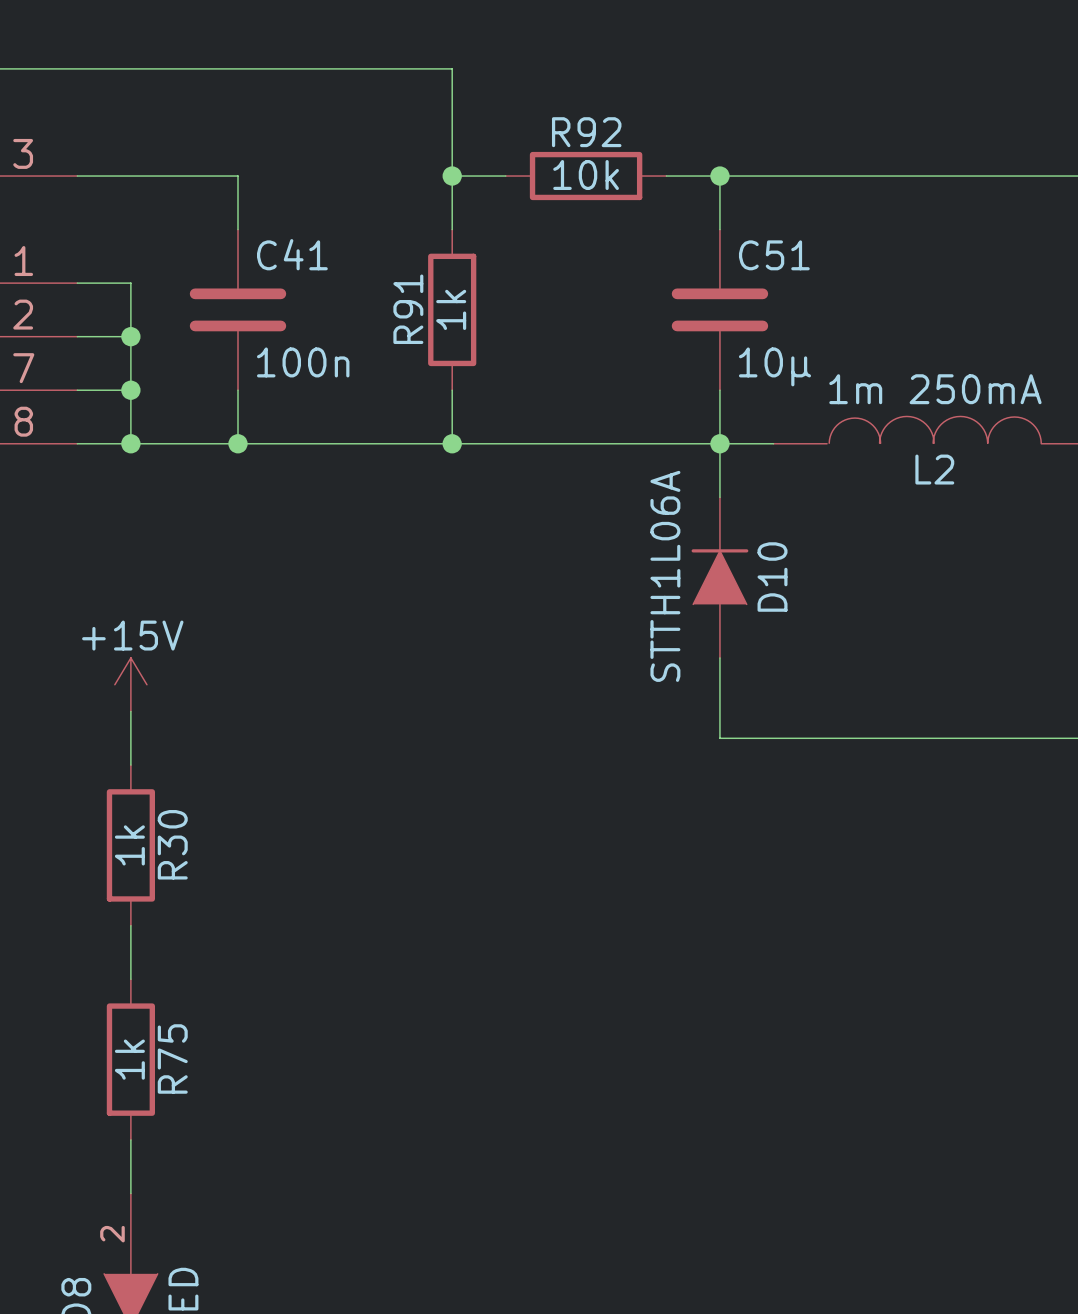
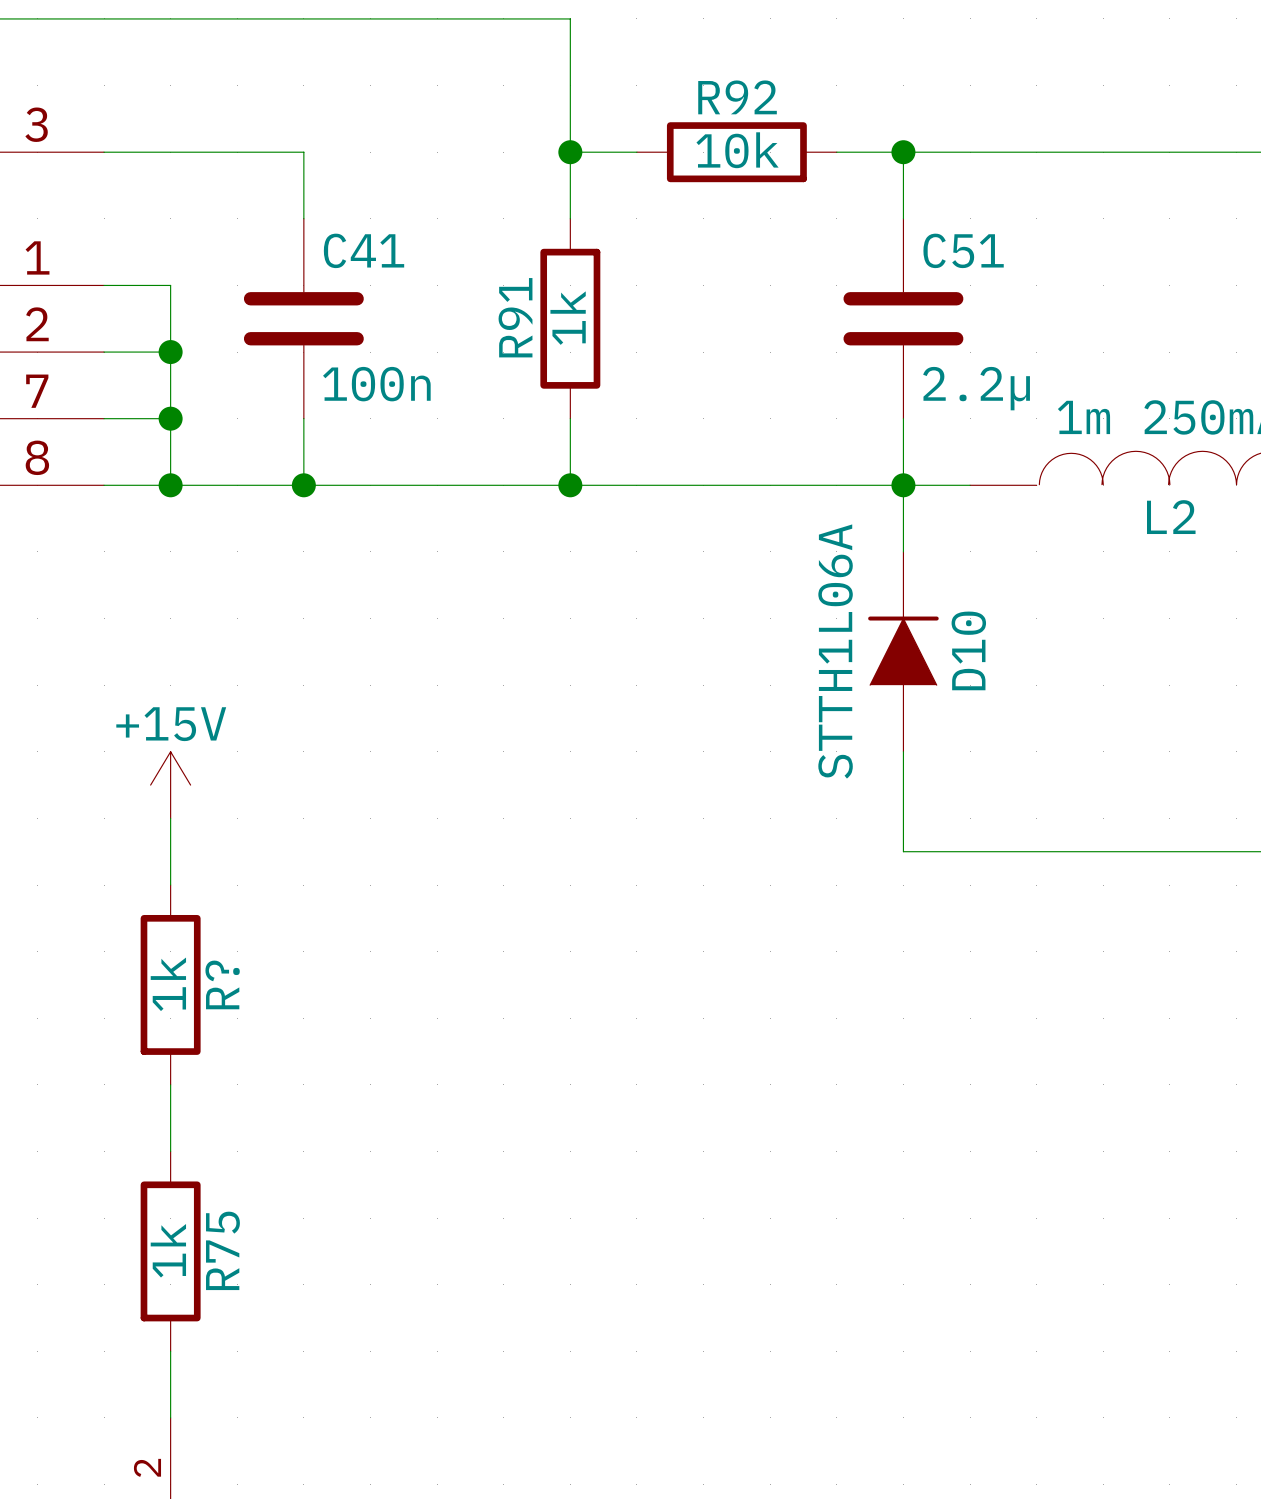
C51 value: 10µ (774, 366) -> 2.2µ (976, 388)
R30 name: R30 (172, 844) -> R? (222, 984)

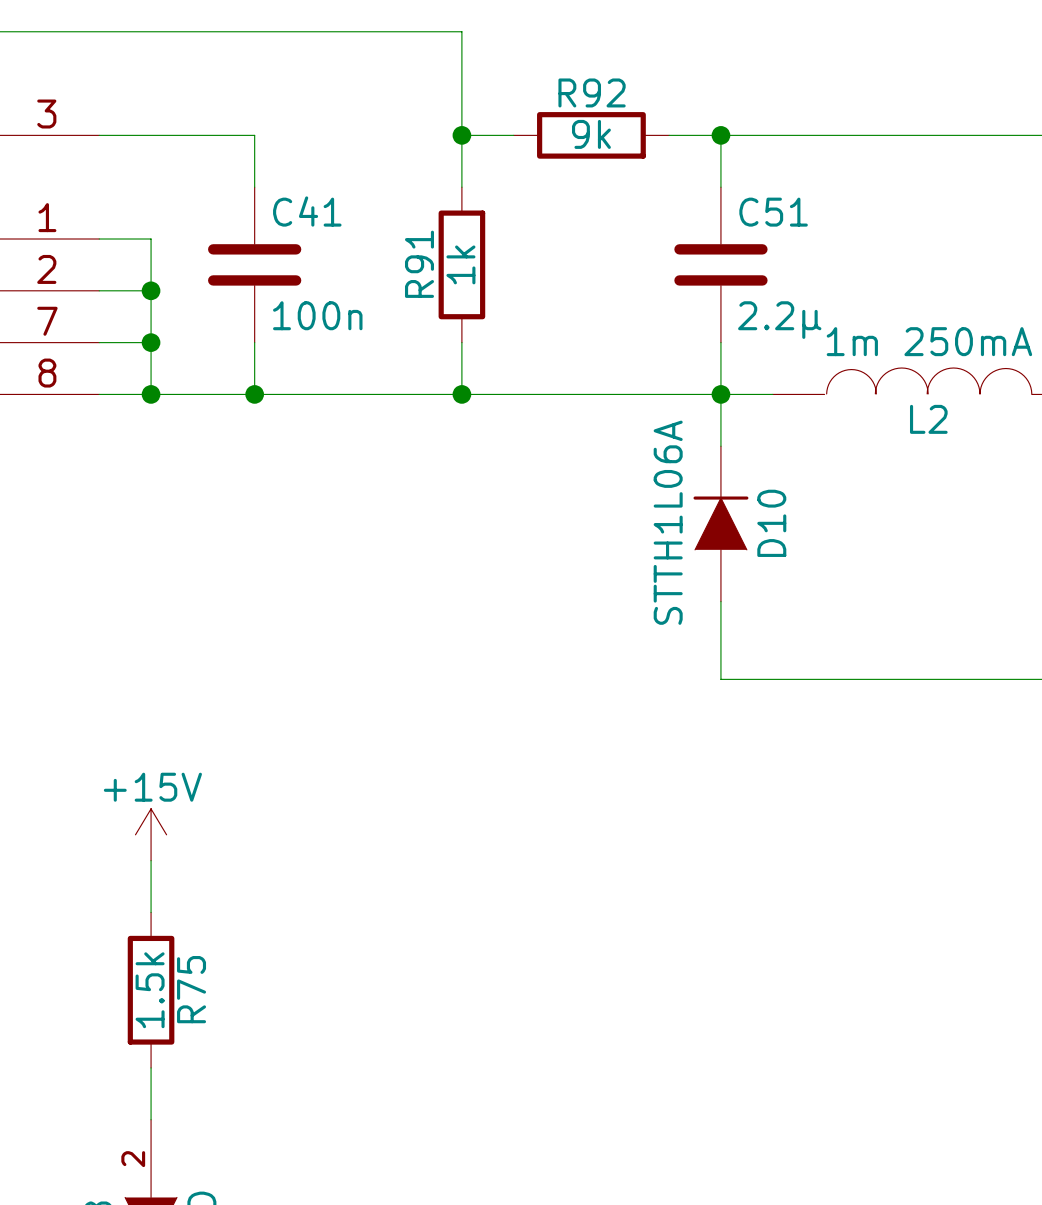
R92 value: 10k (737, 150) -> 9k (591, 134)
power symbol position: +15V (170, 785) -> +15V (151, 834)
wire: (170, 818) (170, 885) -> none
R?: 1k (170, 984) -> none
R75 value: 1k (168, 1250) -> 1.5k (150, 990)

